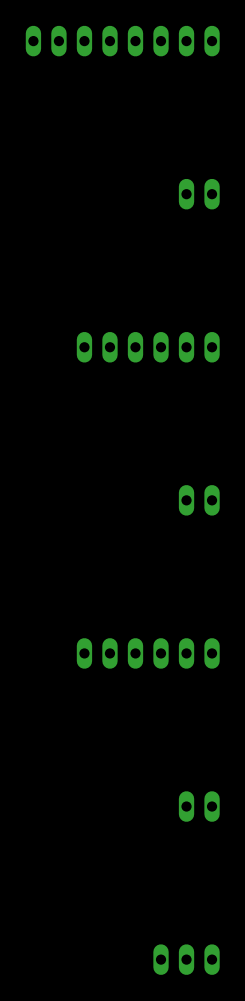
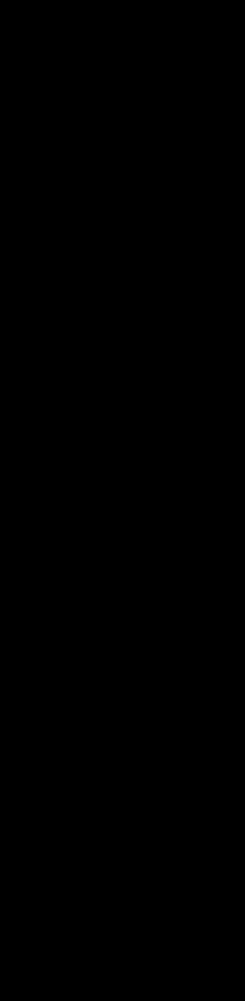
part: (122, 41) -> none
part: (199, 194) -> none
part: (148, 347) -> none
part: (199, 500) -> none
part: (148, 653) -> none
part: (199, 806) -> none
part: (186, 959) -> none

